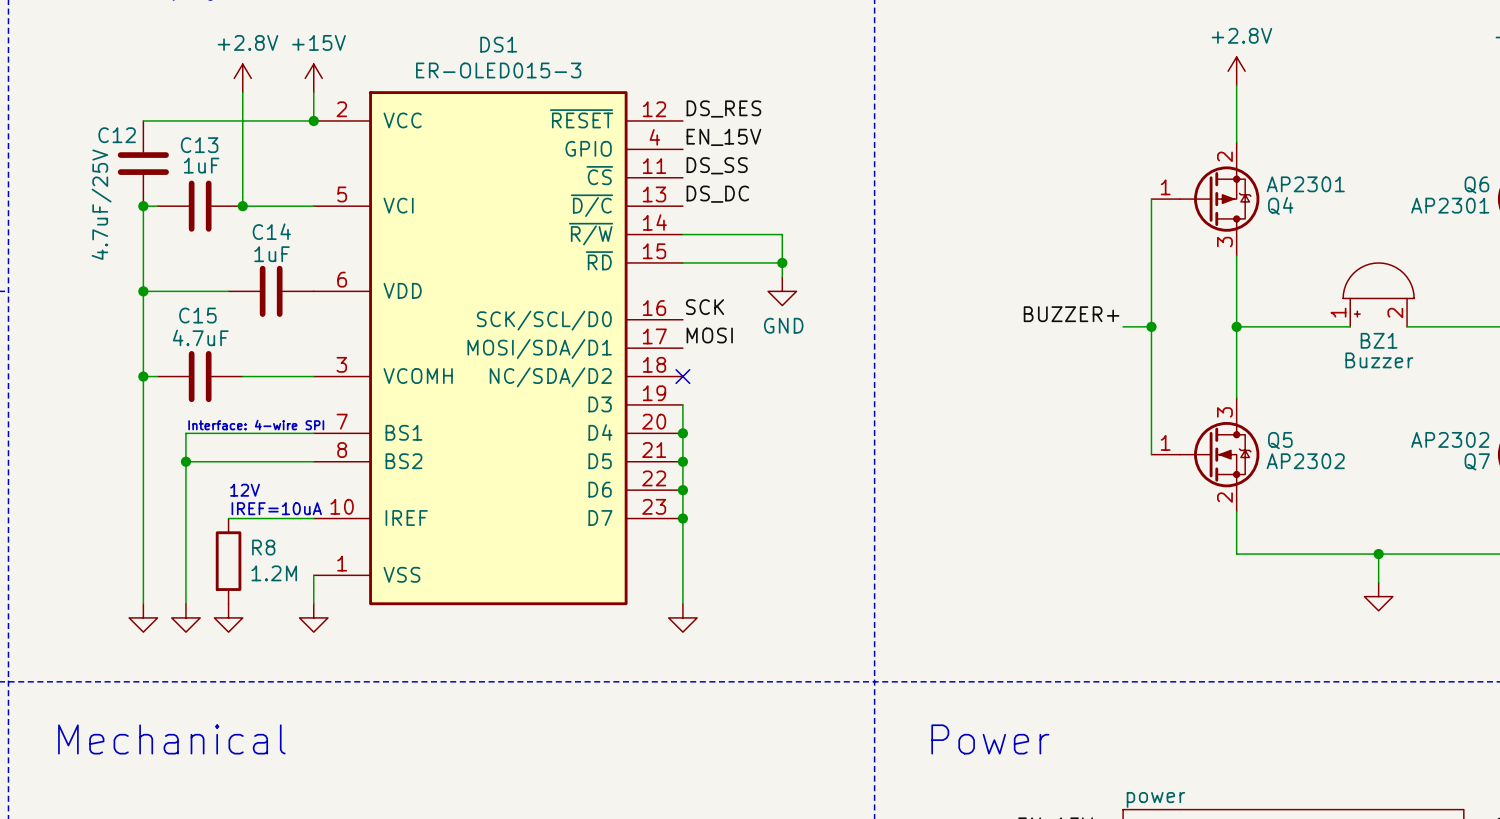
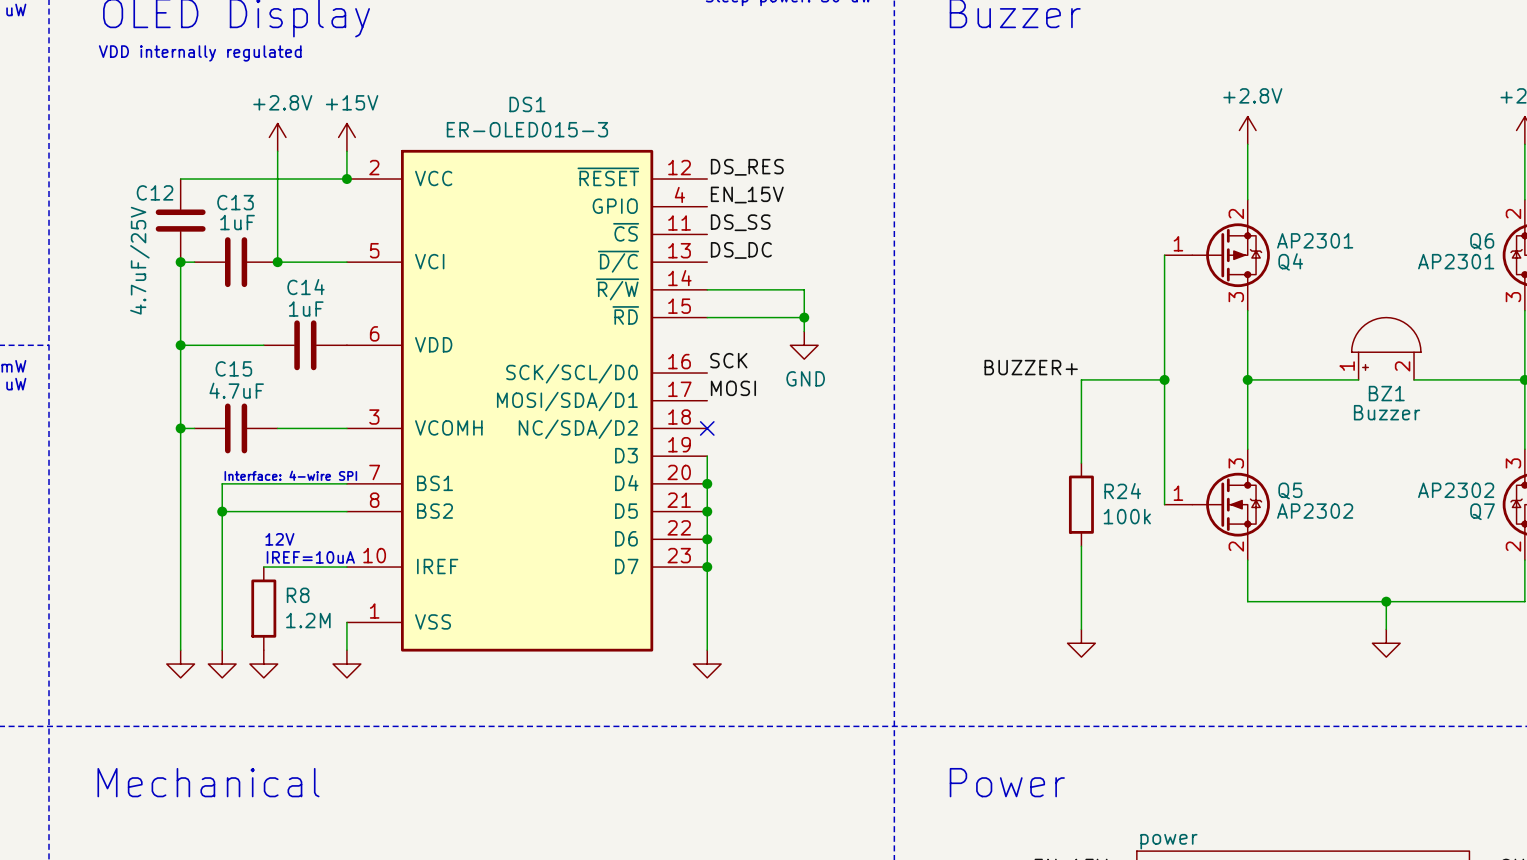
label position: BUZZER+ (1071, 314) -> BUZZER+ (1031, 367)
wire: none -> (1136, 379) (1081, 379) (1081, 463)
R24: none -> 100k (1081, 504)
wire: none -> (1081, 546) (1081, 629)
power symbol: none -> (1081, 643)

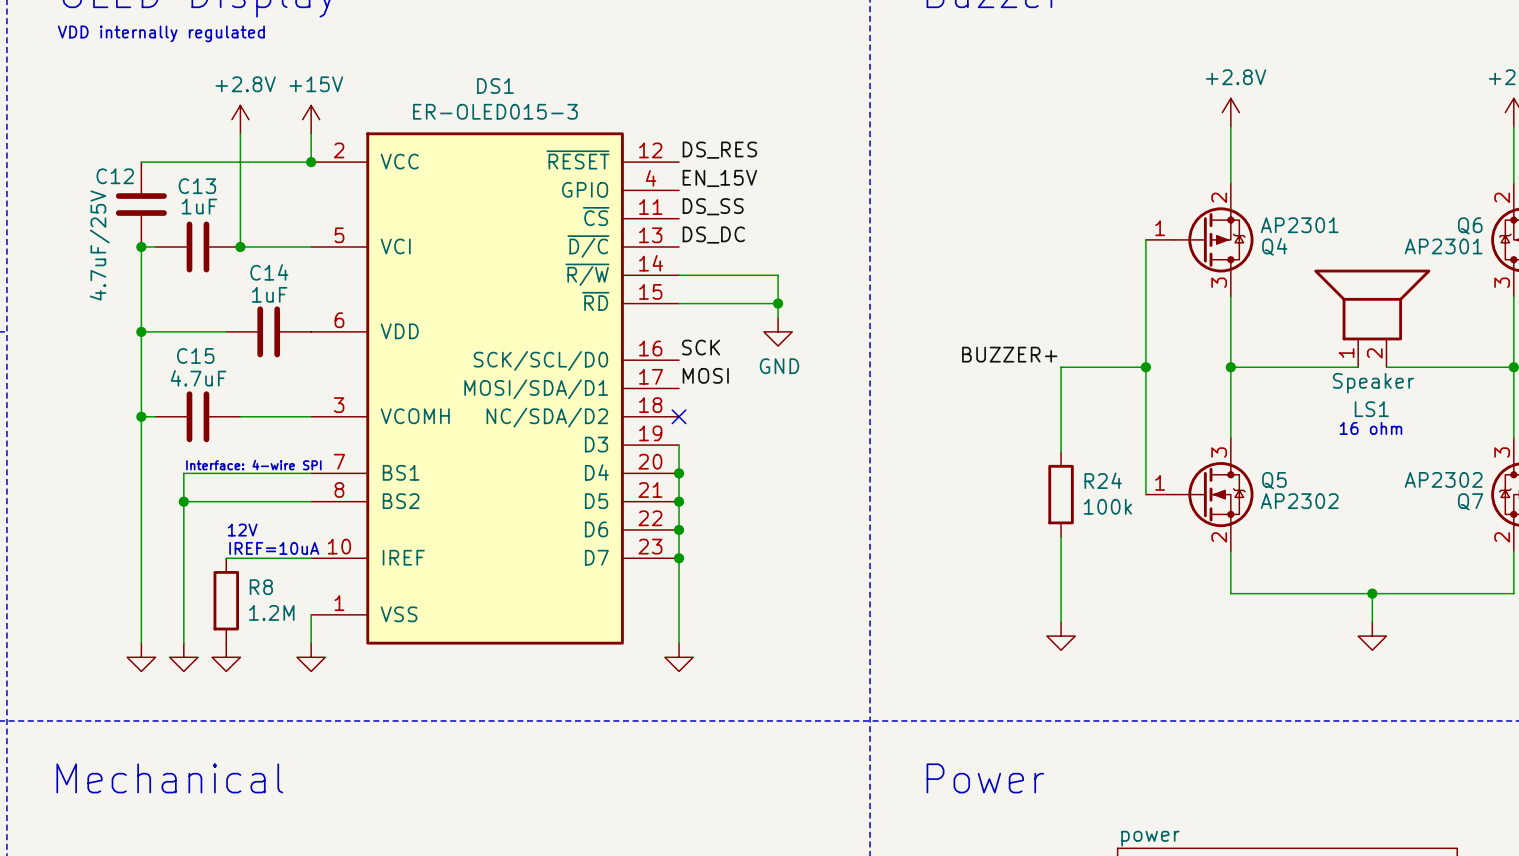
LS1: none -> Speaker (1372, 318)
BZ1: Buzzer (1386, 348) -> none
wire: none -> (1344, 367) (1358, 367)
wire: none -> (1386, 367) (1400, 367)
text: none -> 16 ohm (1370, 428)

